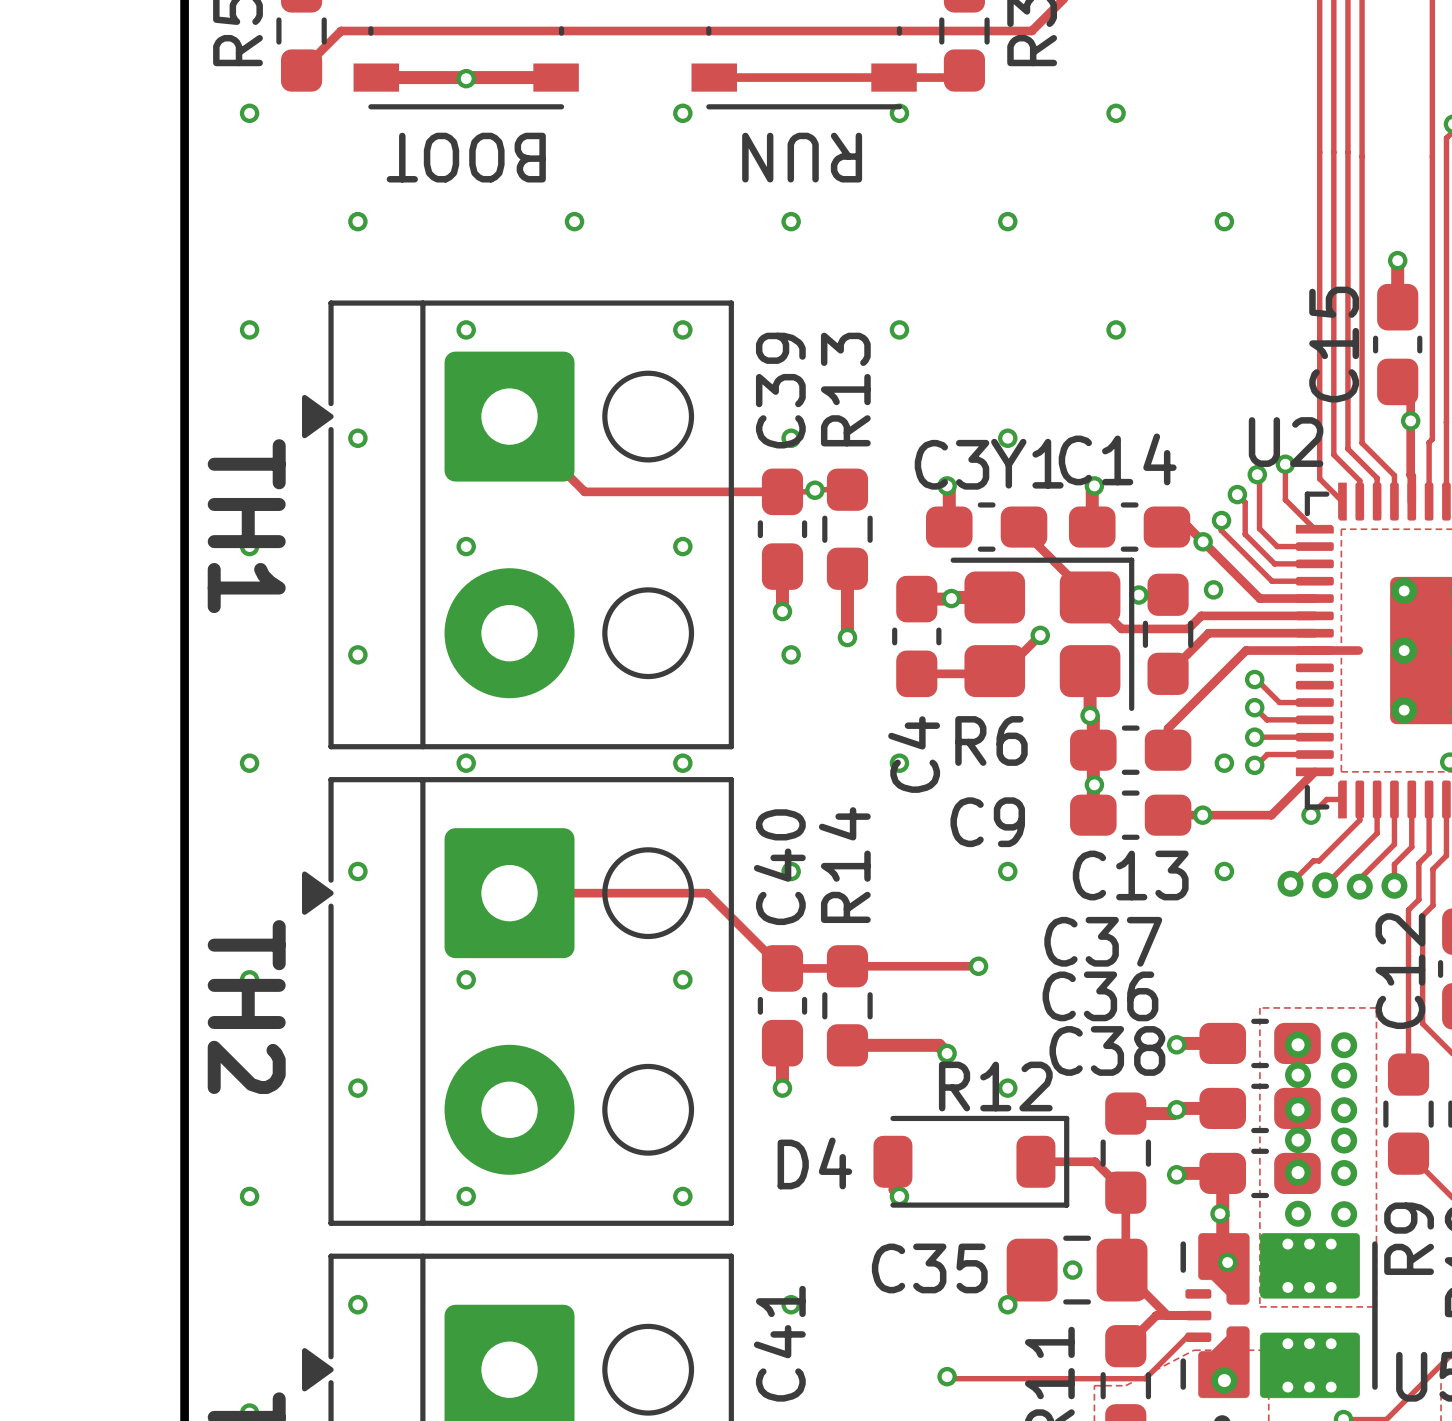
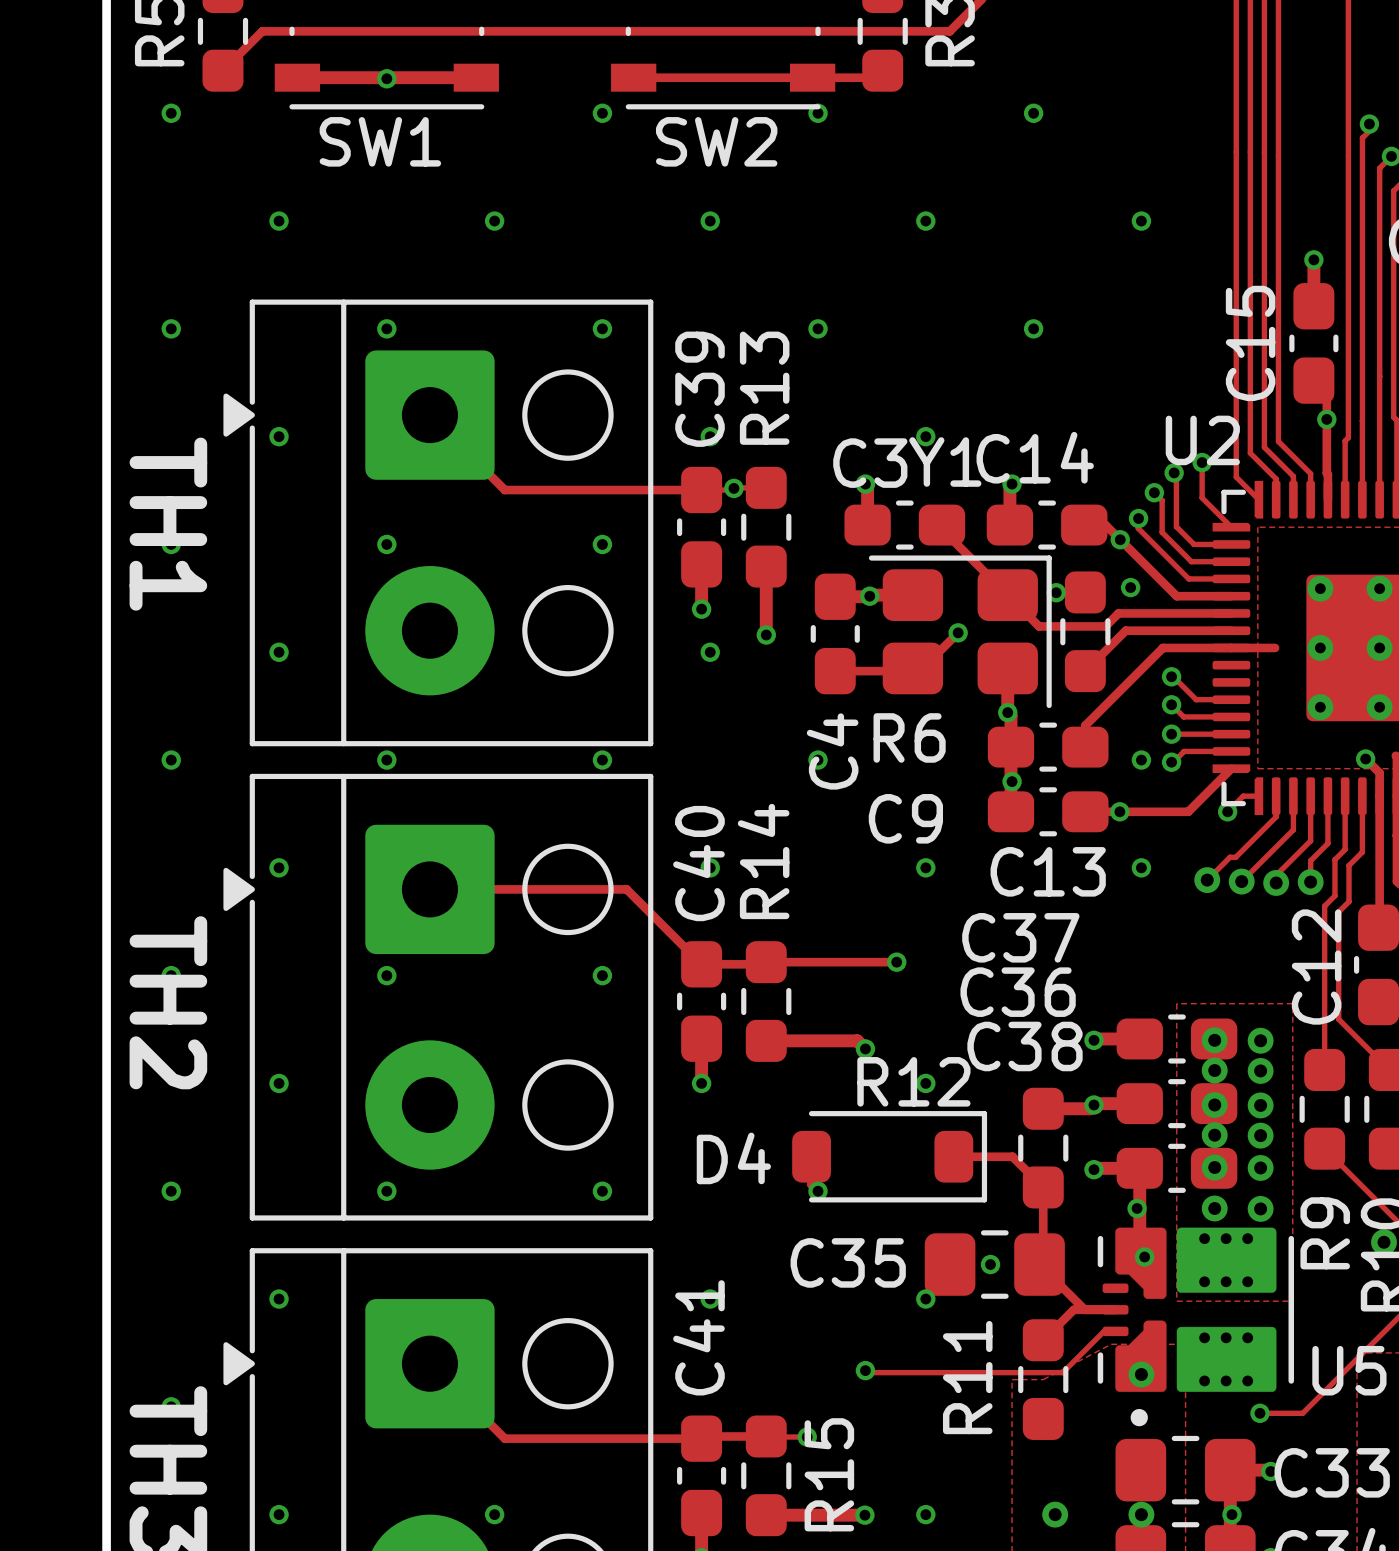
SW1 name: none -> SW1 (380, 141)
SW2 name: none -> SW2 (716, 141)
text: BOOT (466, 157) -> none
text: RUN (802, 157) -> none

